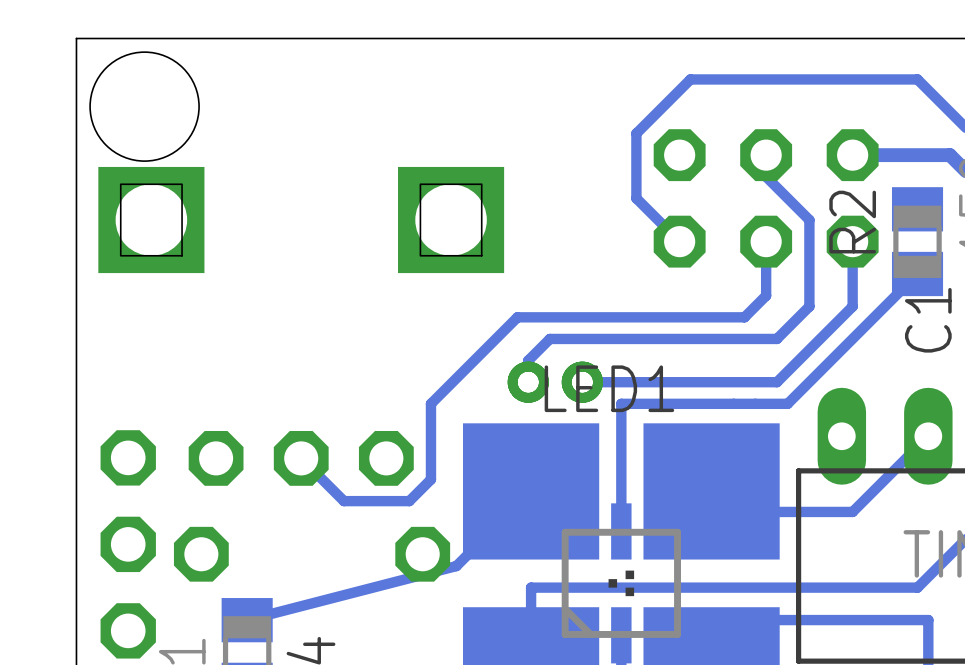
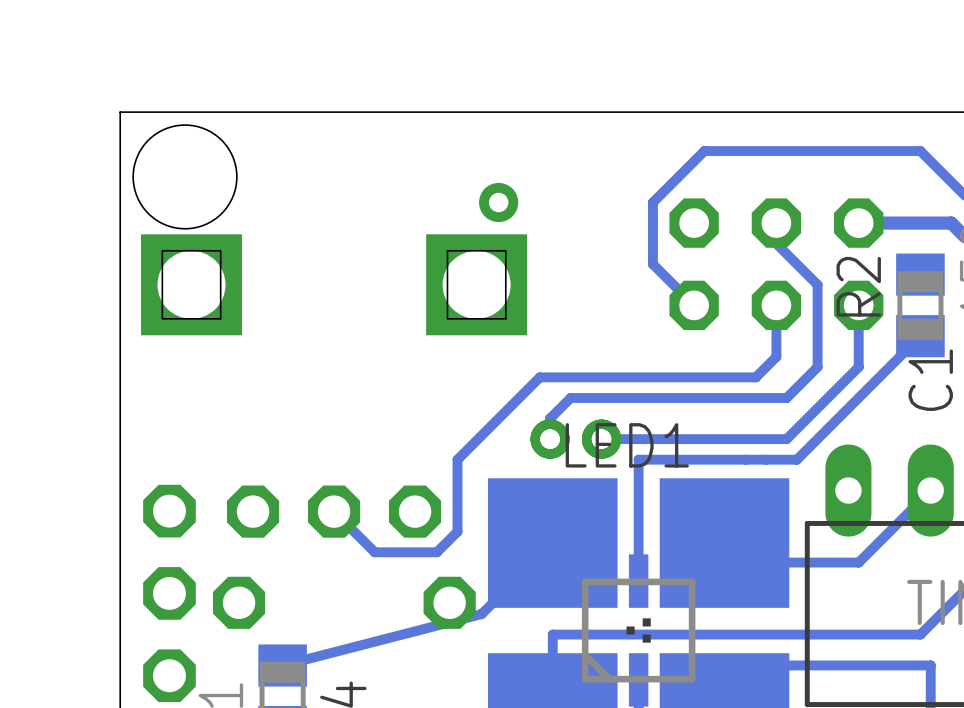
via: none -> (498, 202)

